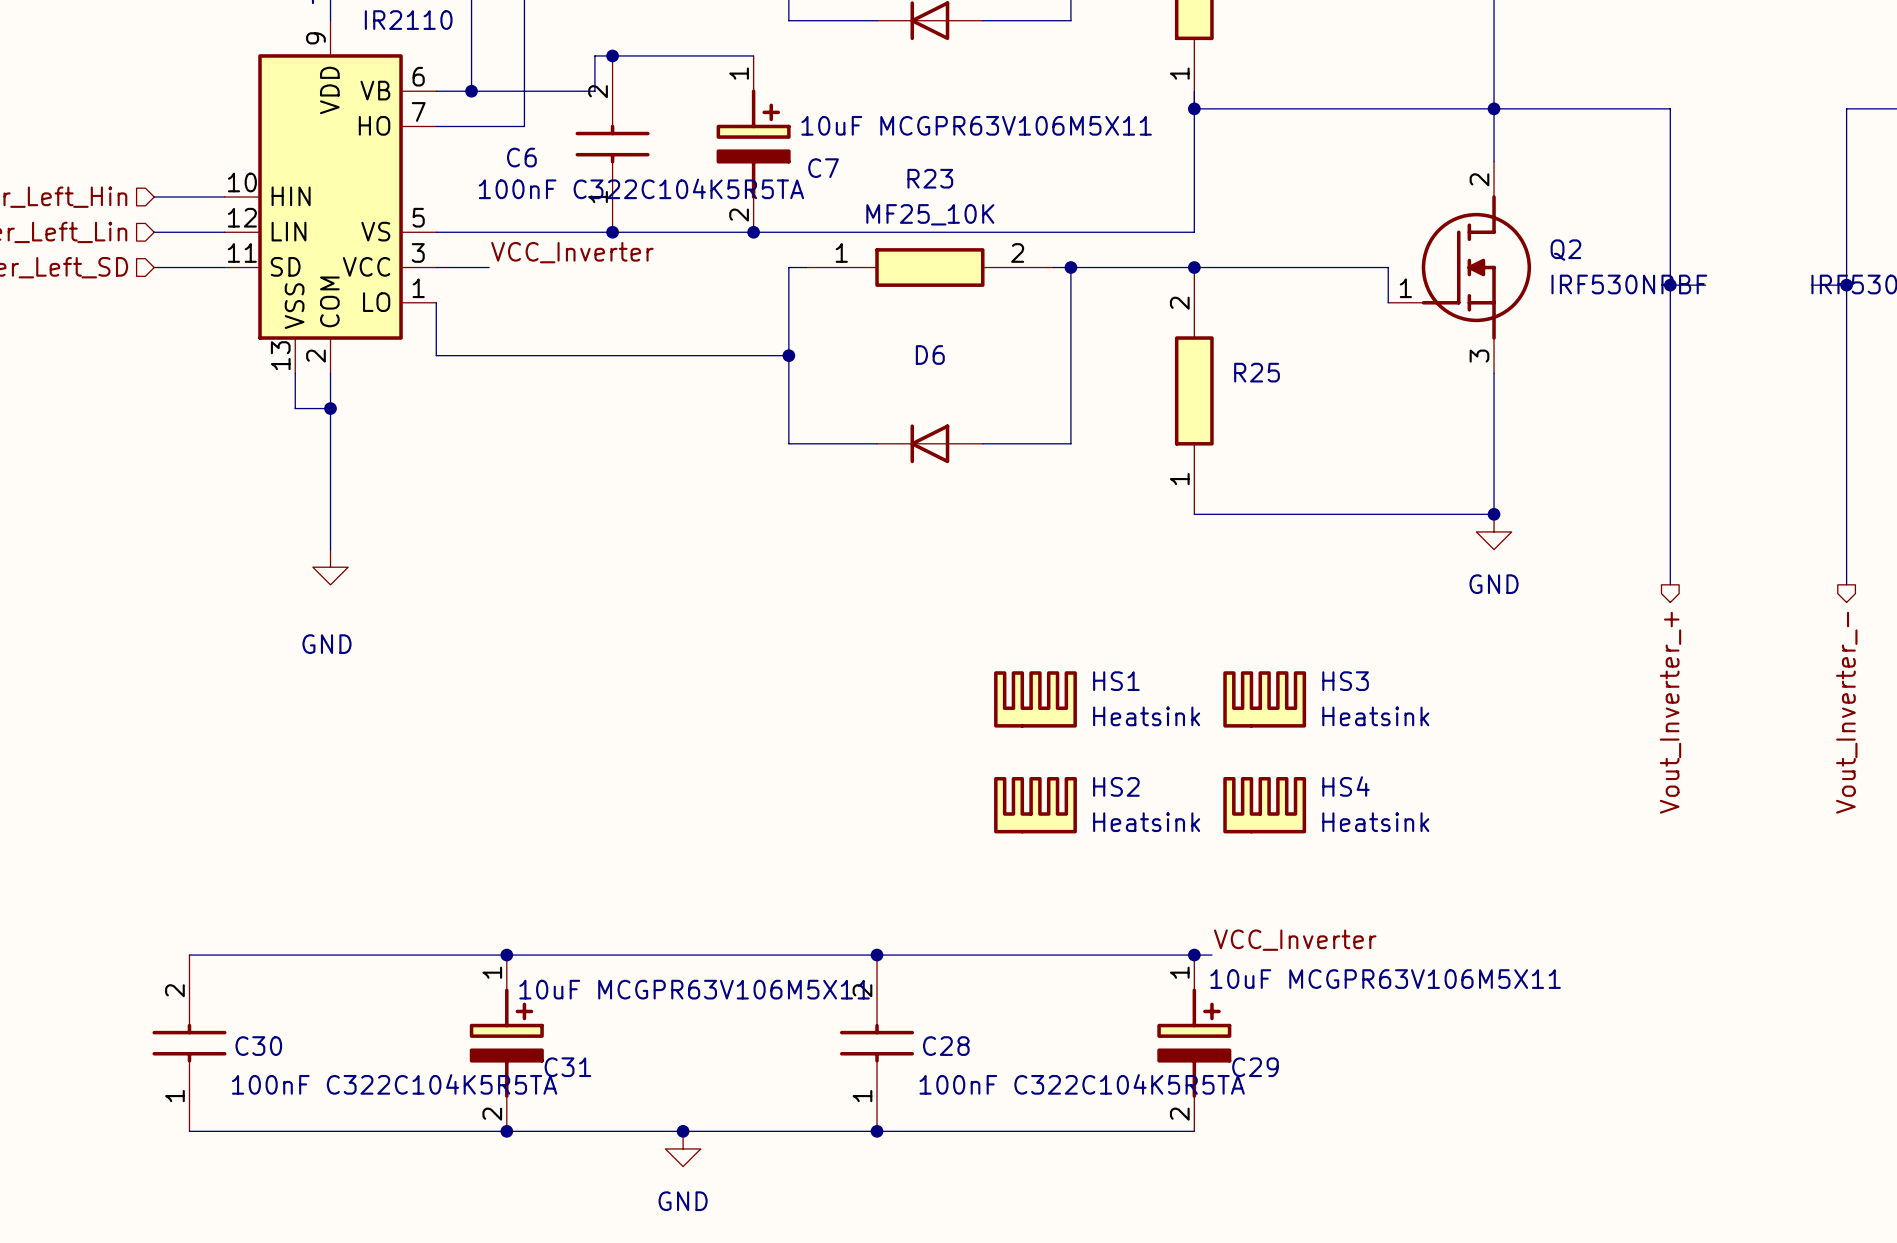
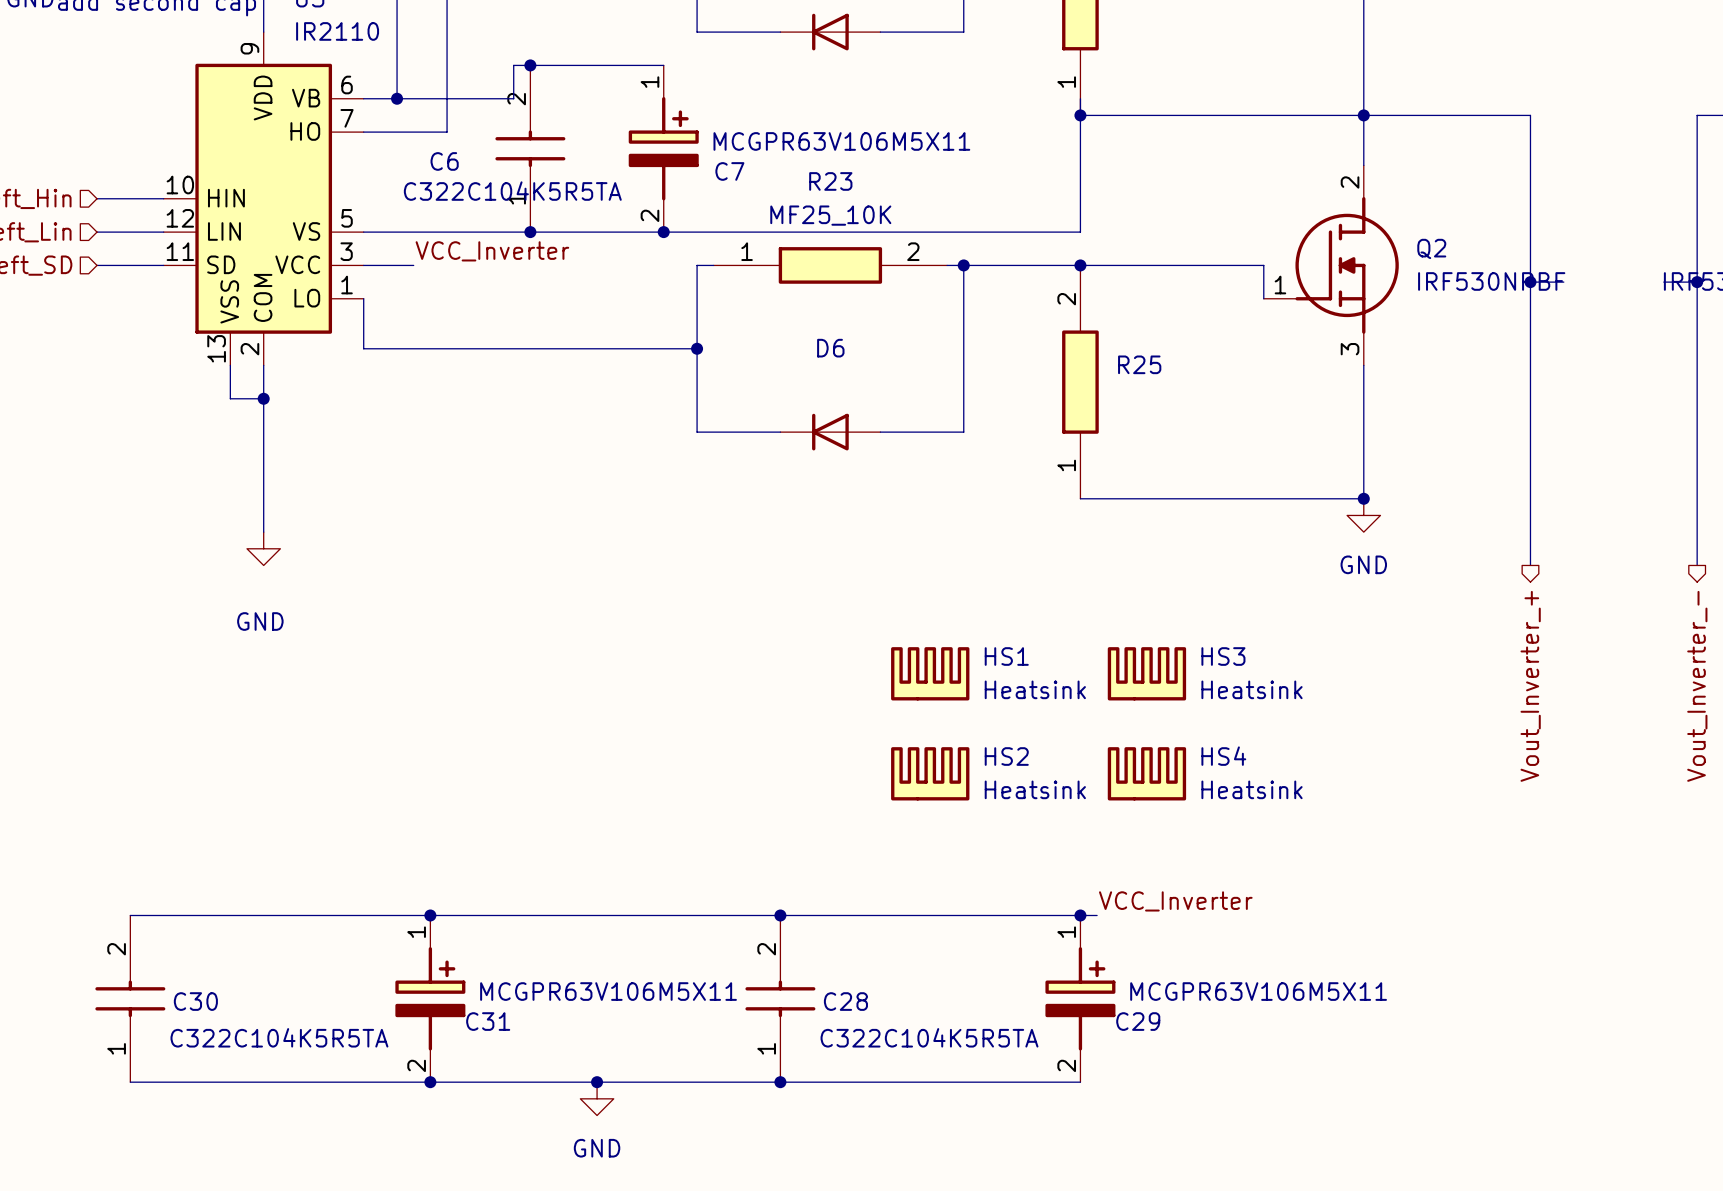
C7 value: 10uF MCGPR63V106M5X11 (976, 125) -> MCGPR63V106M5X11 (841, 141)
C6 value: 100nF C322C104K5R5TA (641, 188) -> C322C104K5R5TA (512, 191)
C29 value: 10uF MCGPR63V106M5X11 (1385, 979) -> MCGPR63V106M5X11 (1258, 991)
C31 value: 10uF MCGPR63V106M5X11 (694, 989) -> MCGPR63V106M5X11 (608, 991)
C30 value: 100nF C322C104K5R5TA (394, 1084) -> C322C104K5R5TA (279, 1037)
C28 value: 100nF C322C104K5R5TA (1082, 1084) -> C322C104K5R5TA (929, 1037)

